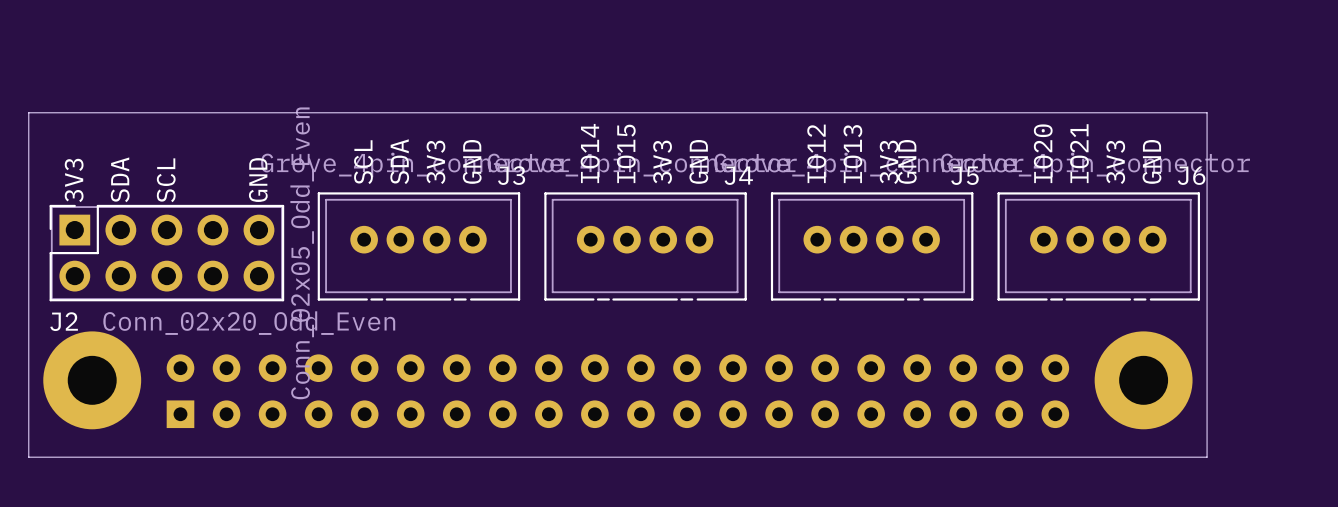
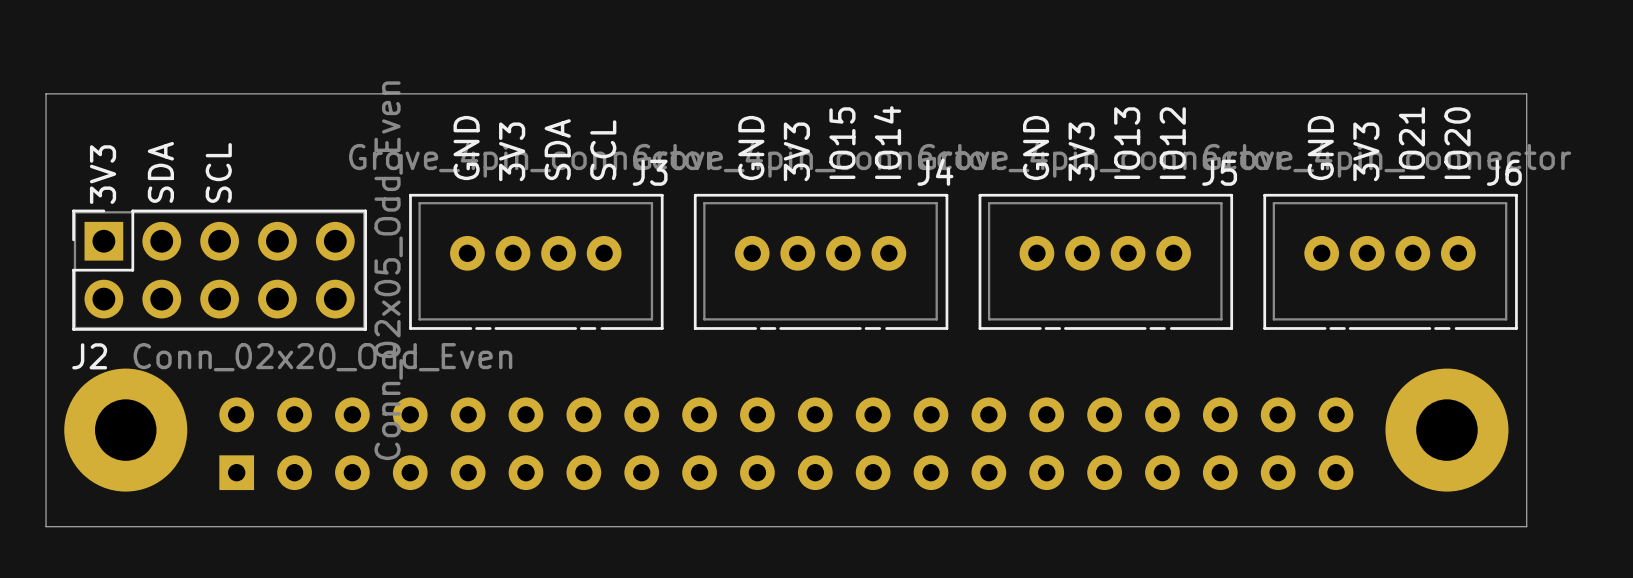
text: IO14 (590, 153) -> GND (751, 148)
text: IO15 (626, 153) -> 3V3 (796, 151)
text: IO12 (816, 153) -> GND (1036, 148)
text: IO20 (1043, 153) -> GND (1320, 148)
text: IO21 (1079, 153) -> 3V3 (1366, 151)
text: IO13 (852, 154) -> 3V3 (1081, 151)
text: SDA (399, 161) -> 3V3 (512, 151)
text: GND (472, 161) -> SCL (603, 150)
text: GND (698, 161) -> IO14 (887, 142)
text: GND (907, 161) -> IO12 (1172, 143)
text: GND (1151, 161) -> IO20 (1457, 143)
text: SCL (363, 162) -> GND (466, 148)
text: 3V3 (435, 162) -> SDA (557, 149)
text: 3V3 (662, 162) -> IO15 (842, 143)
text: 3V3 (889, 162) -> IO13 (1127, 143)
text: 3V3 (1115, 162) -> IO21 (1411, 143)
text: GND (258, 180) -> none

